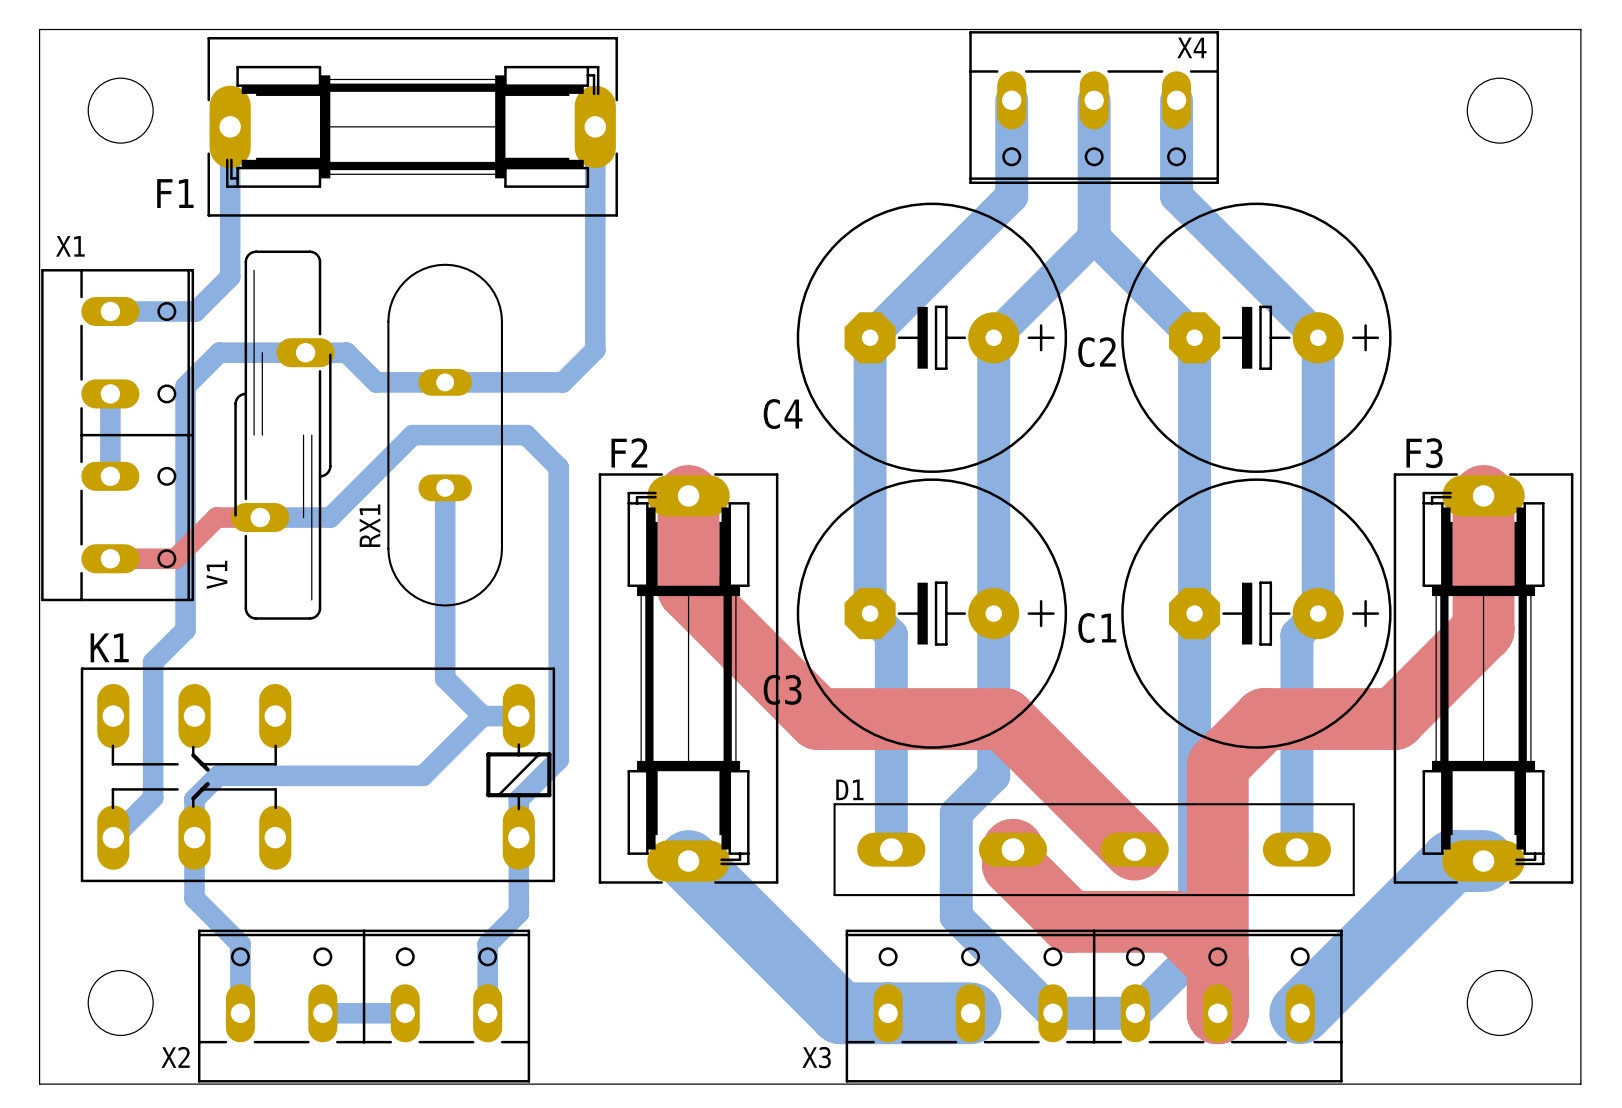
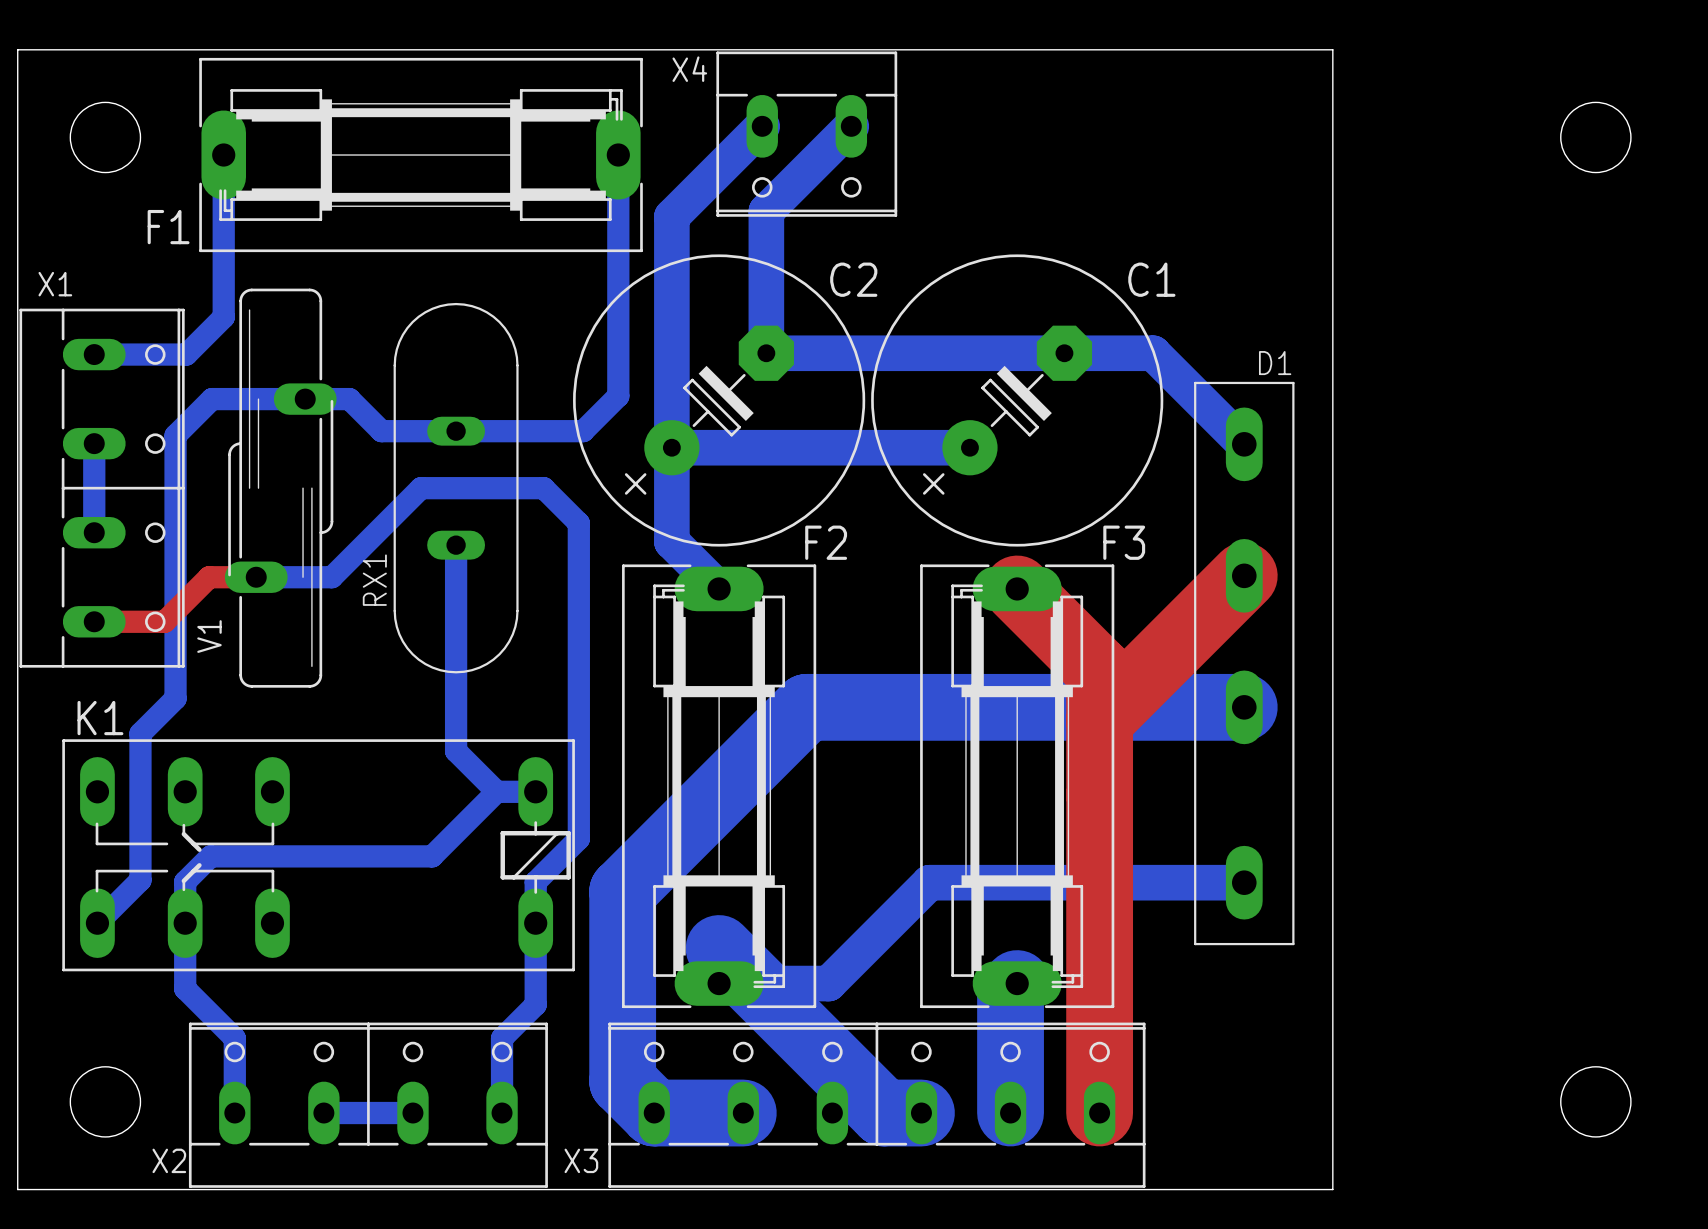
board edge: (1256, 29) (1580, 29) (1580, 1084) (1256, 1084) -> (1332, 49) (1332, 1189)
X4 footprint: [969, 31, 1220, 184] -> [716, 51, 898, 217]
X4 name position: X4 (1191, 47) -> X4 (689, 69)
bottom track: none -> (762, 126) (671, 216) (671, 541) (719, 588)
bottom track: none -> (851, 126) (766, 211) (766, 353) (1153, 353) (1244, 444)
bottom track: (1011, 100) (1011, 196) (870, 337) (870, 613) (891, 634) (891, 849) -> none
bottom track: (1094, 100) (1094, 237) -> none
bottom track: (1176, 100) (1176, 196) (1318, 337) (1318, 613) (1296, 634) (1296, 849) -> none
bottom track: (1094, 237) (1194, 337) (1194, 954) (1135, 1013) (1052, 1013) (956, 916) (956, 813) (993, 775) (993, 337) (1094, 237) -> none
C4: (931, 337) -> none
C2 rotation: 0° (1256, 337) -> 135° clockwise (719, 400)
C2 position: (1256, 337) -> (719, 400)
bottom track: none -> (671, 447) (969, 447)
F2 name position: F2 (629, 452) -> F2 (826, 542)
F3 name position: F3 (1424, 453) -> F3 (1124, 542)
top track: (688, 495) (688, 589) (818, 719) (1004, 719) (1134, 849) -> none
top track: (1483, 495) (1483, 629) (1394, 719) (1264, 719) (1217, 765) (1217, 1013) -> none
top track: none -> (1244, 575) (1099, 720)
top track: none -> (1017, 588) (1099, 671) (1099, 1113)
C3: (931, 613) -> none
C1 rotation: 0° (1256, 613) -> 135° clockwise (1017, 400)
C1 position: (1256, 613) -> (1017, 400)
bottom track: none -> (1244, 707) (806, 707) (622, 891) (622, 1081) (654, 1113) (743, 1113)
F2 position: (688, 678) -> (719, 786)
F3 position: (1483, 678) -> (1017, 786)
D1 name position: D1 (849, 789) -> D1 (1275, 363)
bottom track: none -> (1244, 882) (929, 882) (828, 983) (719, 983)
top track: (1013, 849) (1013, 865) (1069, 921) (1175, 921) (1217, 964) -> none
D1 rotation: 0° (1094, 849) -> 90° clockwise (1244, 663)
bottom track: (1483, 861) (1452, 861) (1300, 1013) -> none
bottom track: none -> (1017, 983) (1010, 990) (1010, 1113)
X3 position: (1094, 1006) -> (876, 1105)
bottom track: (875, 1013) (970, 1013) -> none

